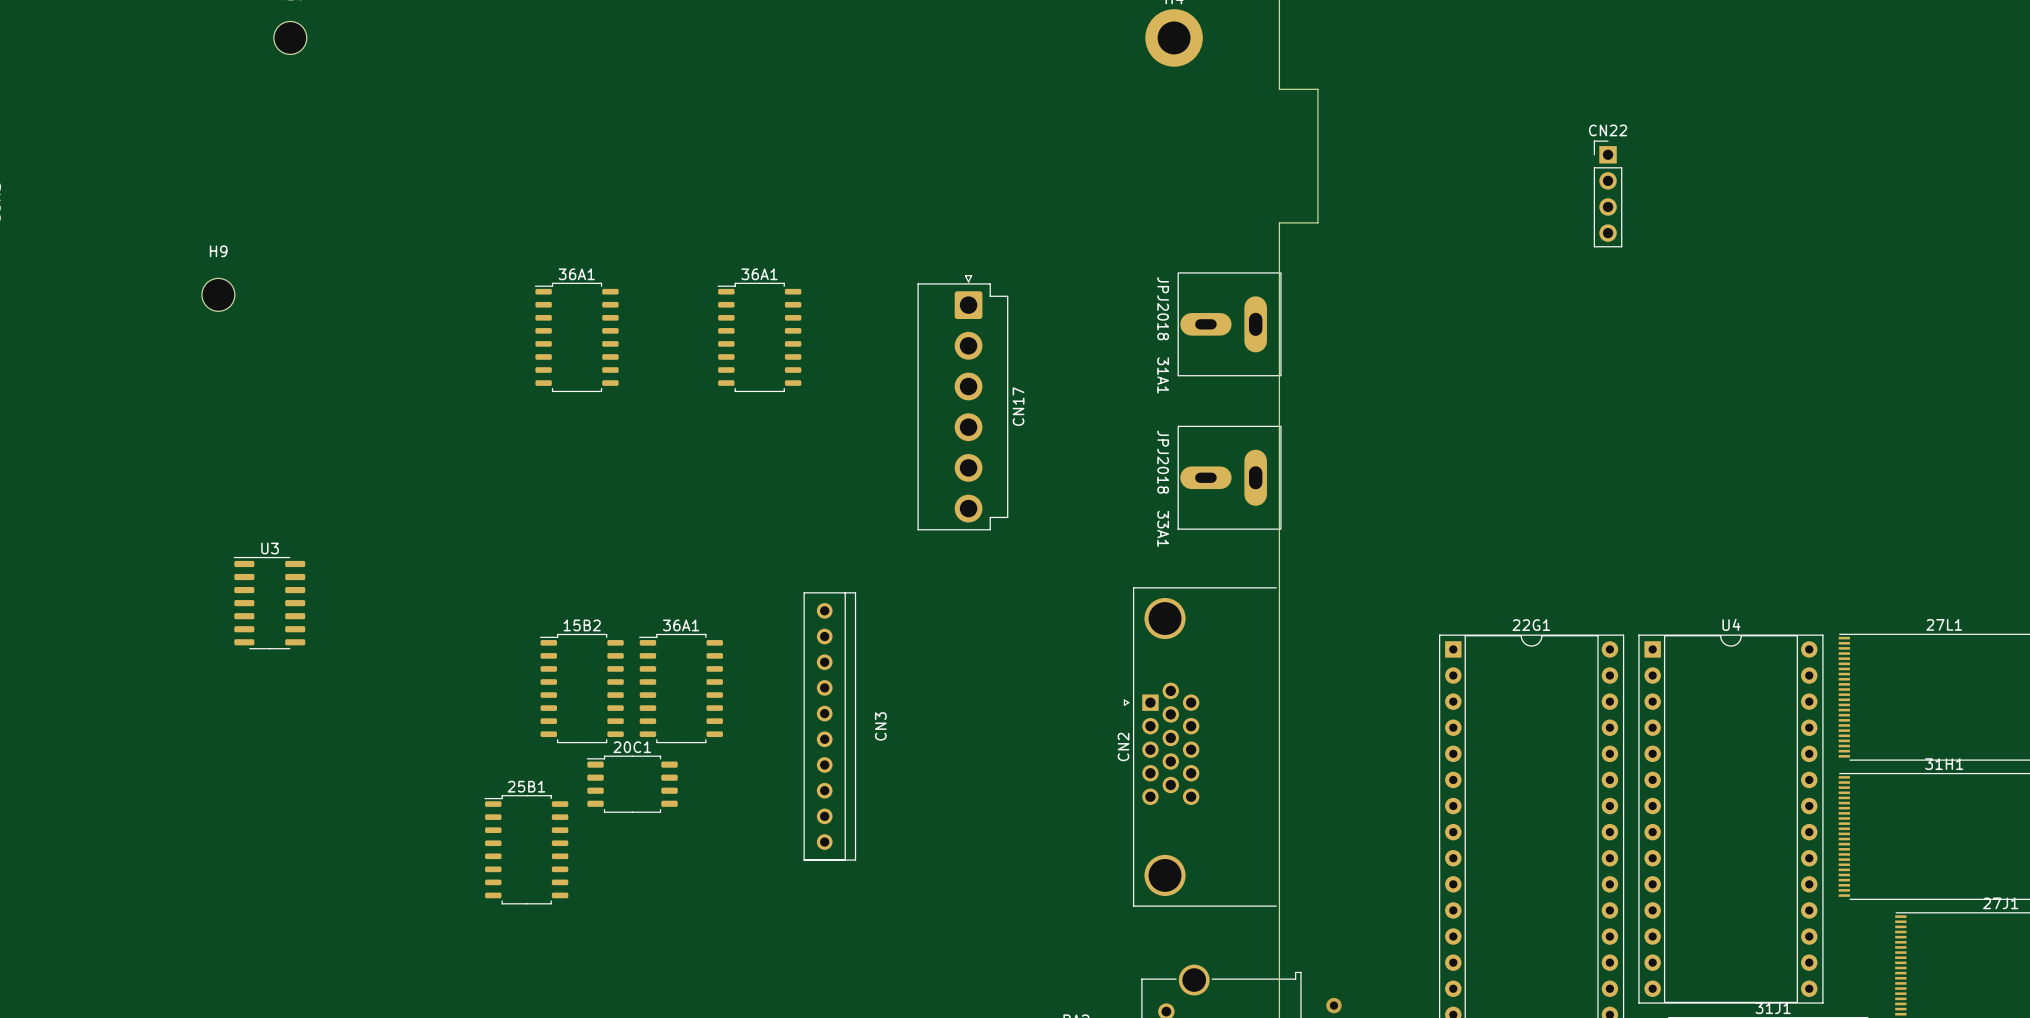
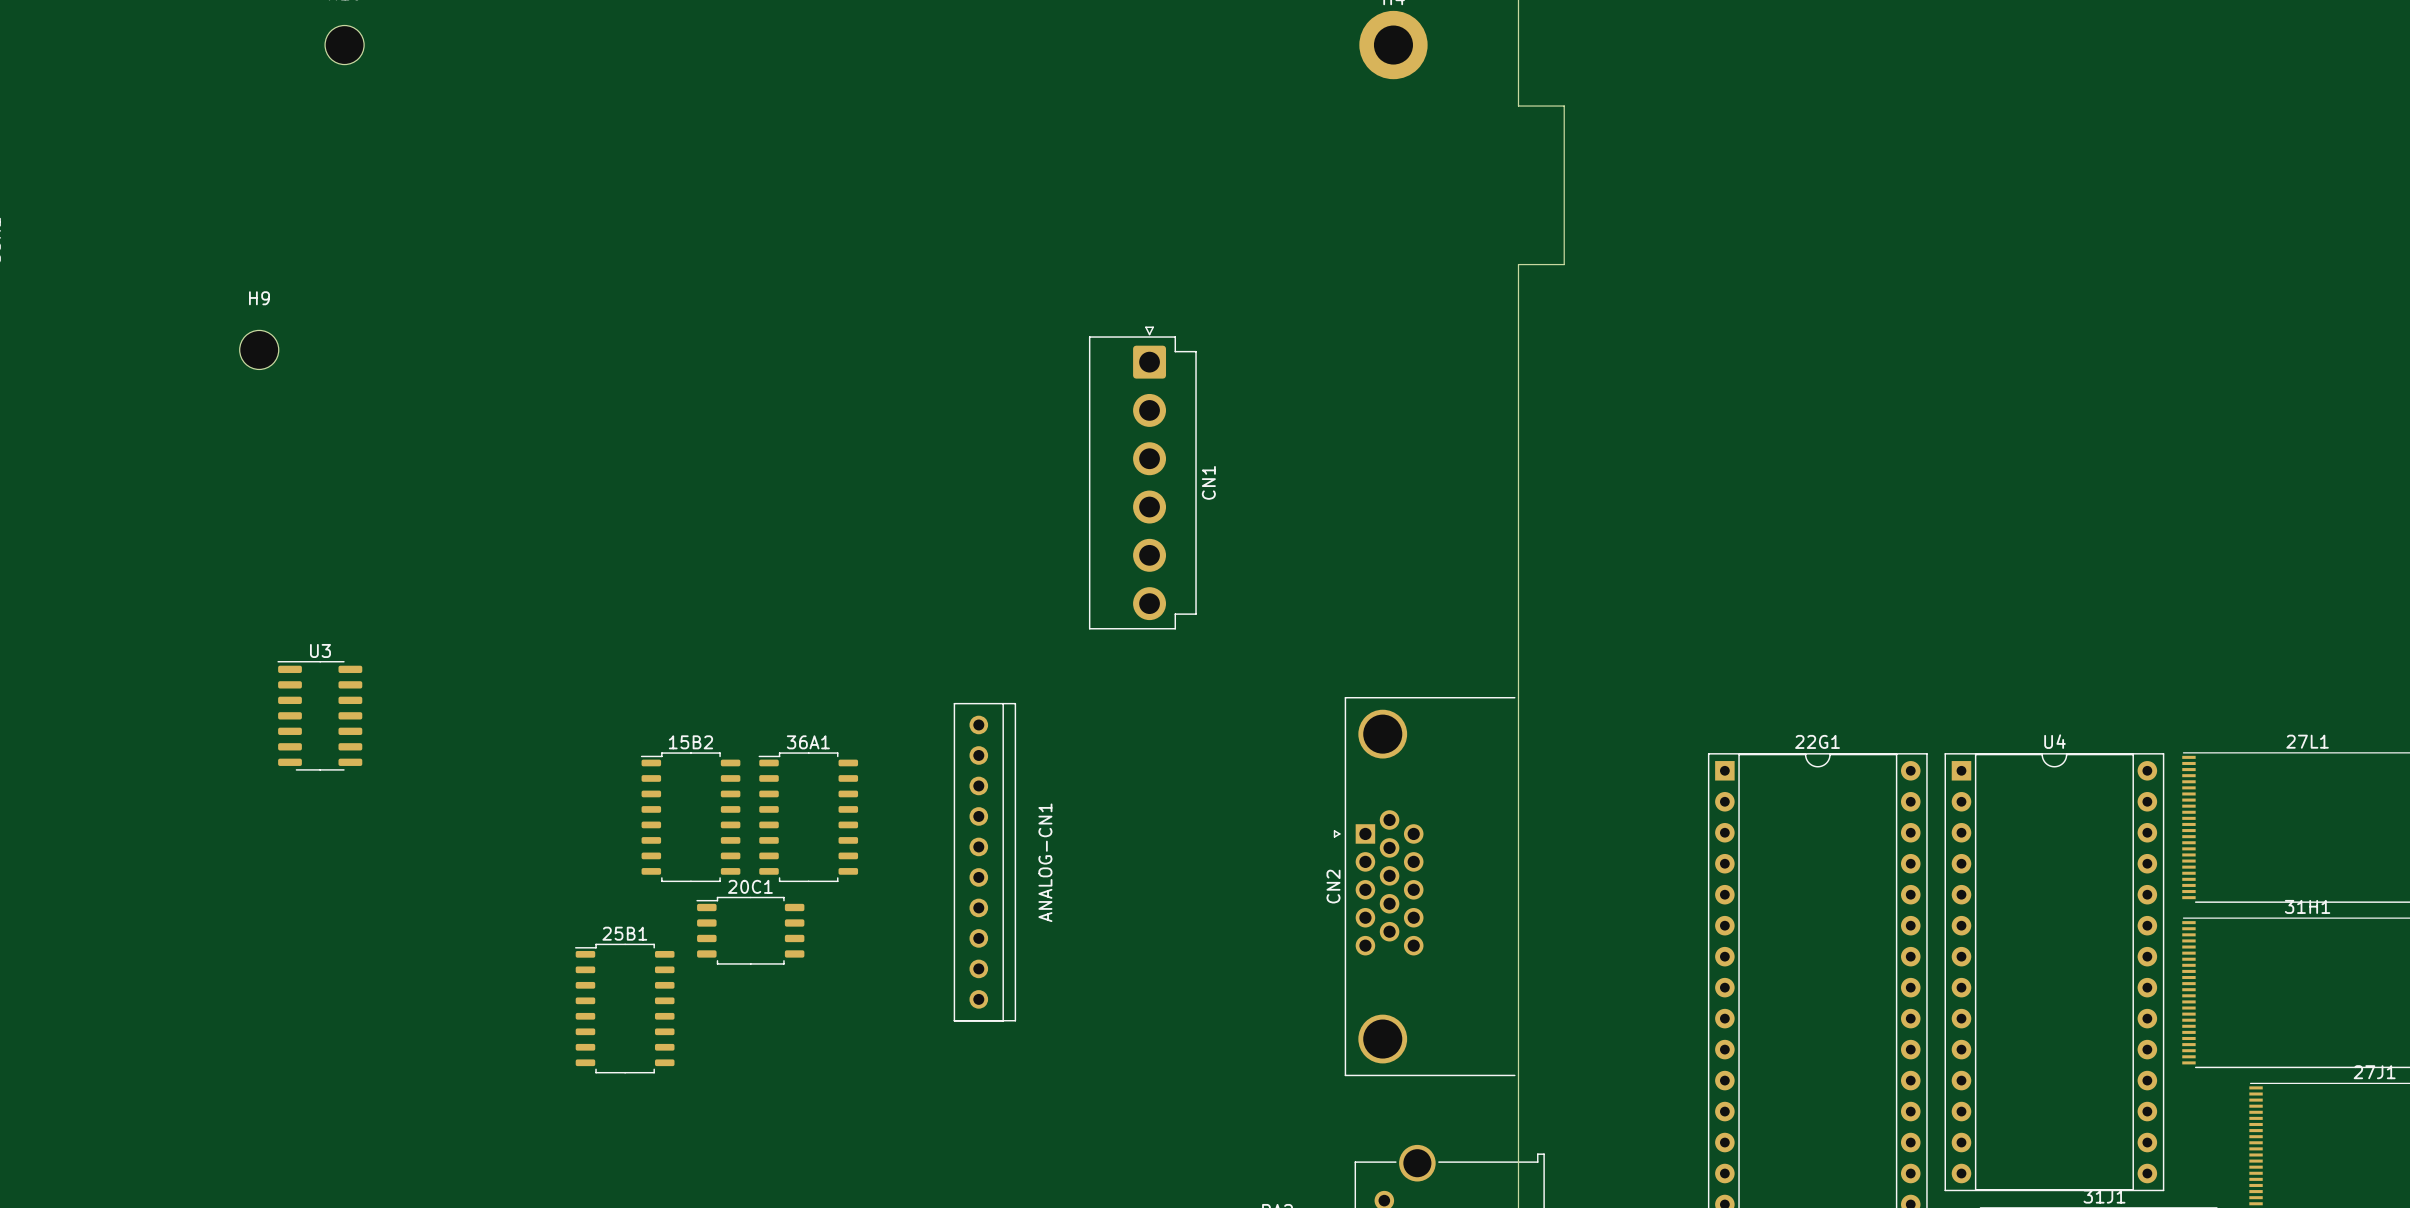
CN22: (1608, 193) -> none
31A1: (1229, 324) -> none
36A1: (576, 337) -> none
36A1: (759, 337) -> none
CN17 name: CN17 (1018, 406) -> CN1 (1208, 482)
33A1: (1229, 477) -> none
CN3 name: CN3 (880, 726) -> ANALOG-CN1 (1045, 862)
via: (1333, 1005) -> none

